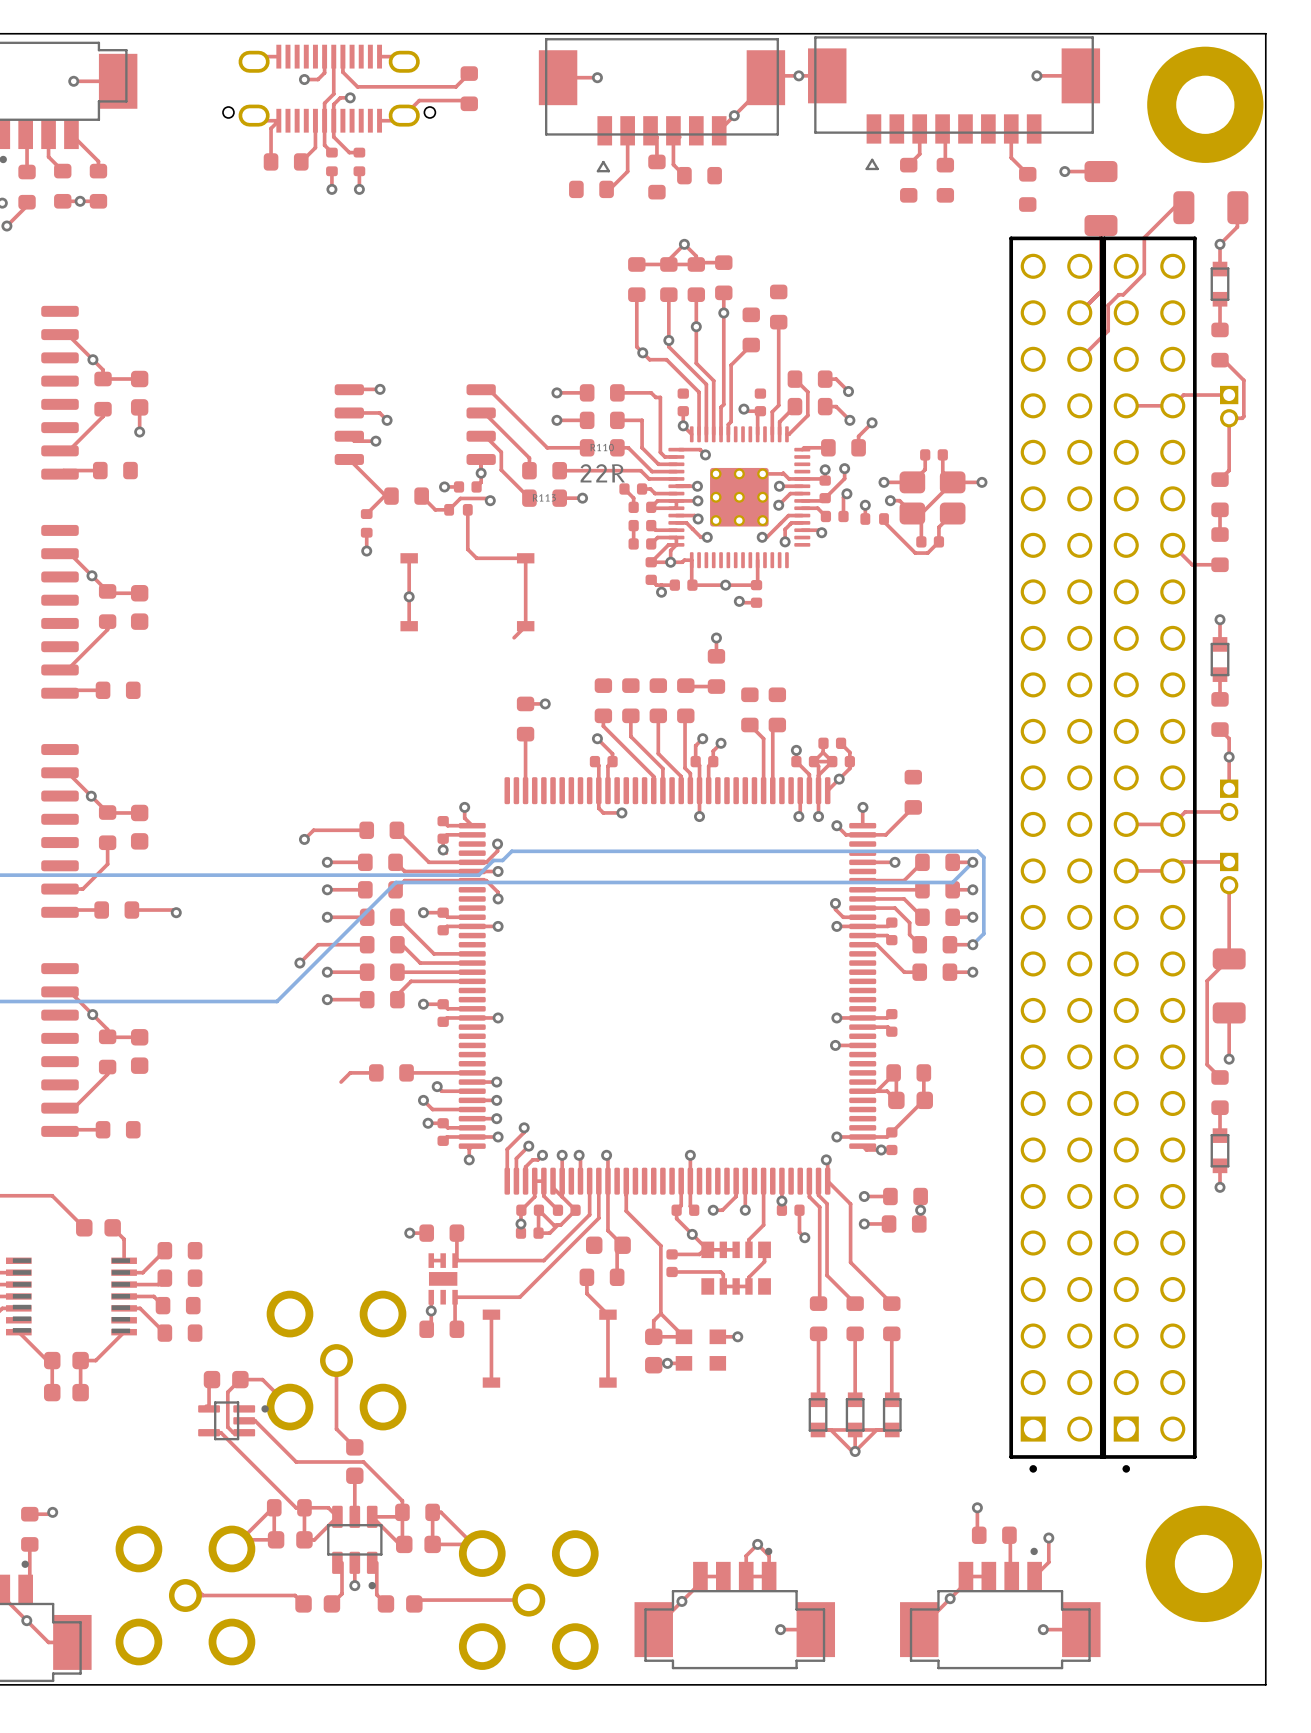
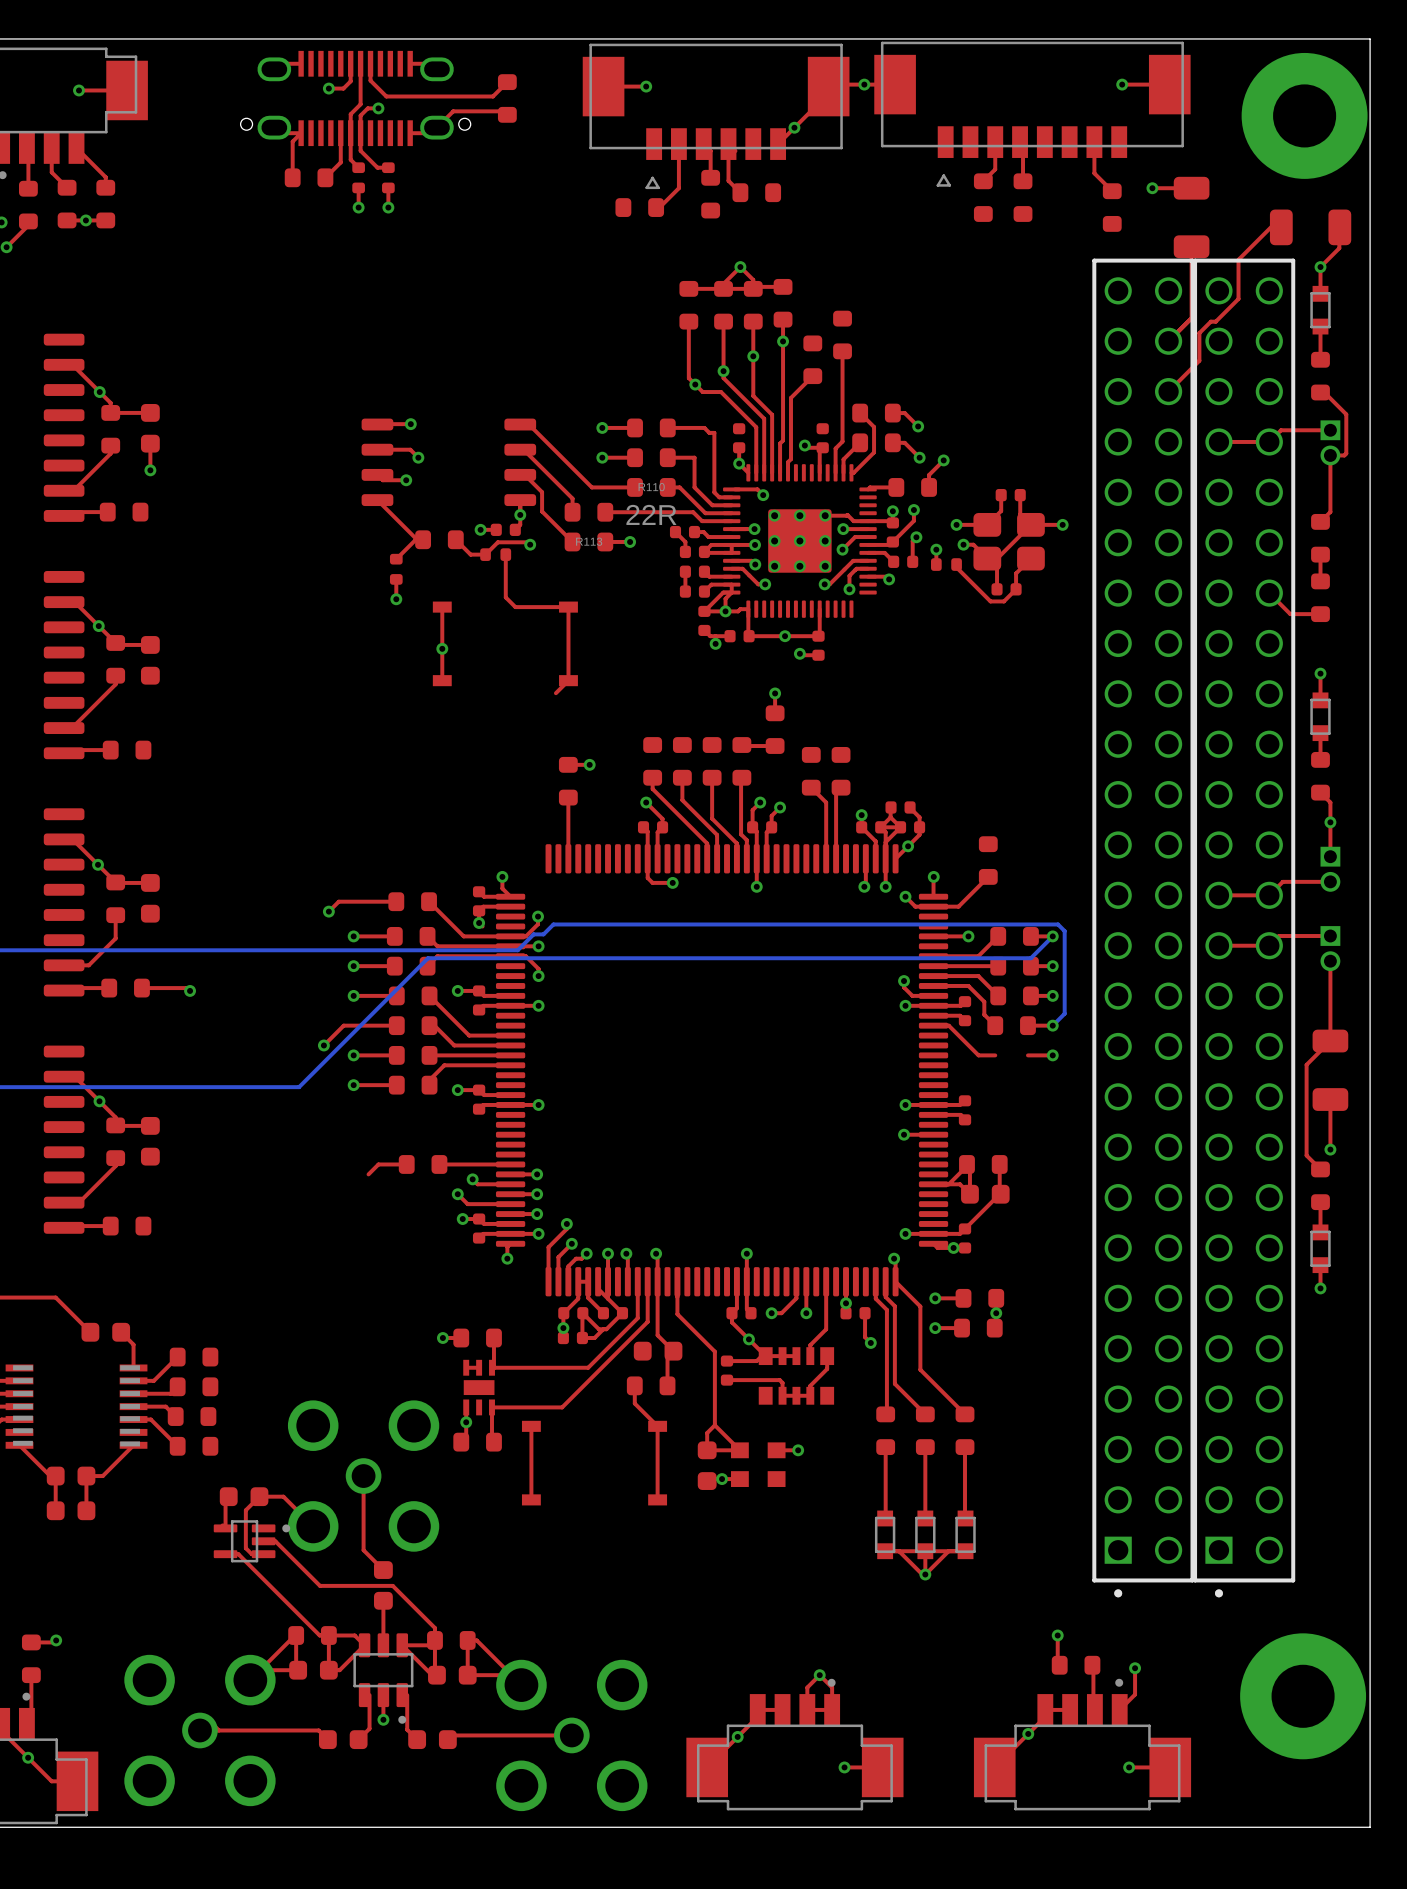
part: (934, 972) -> none

